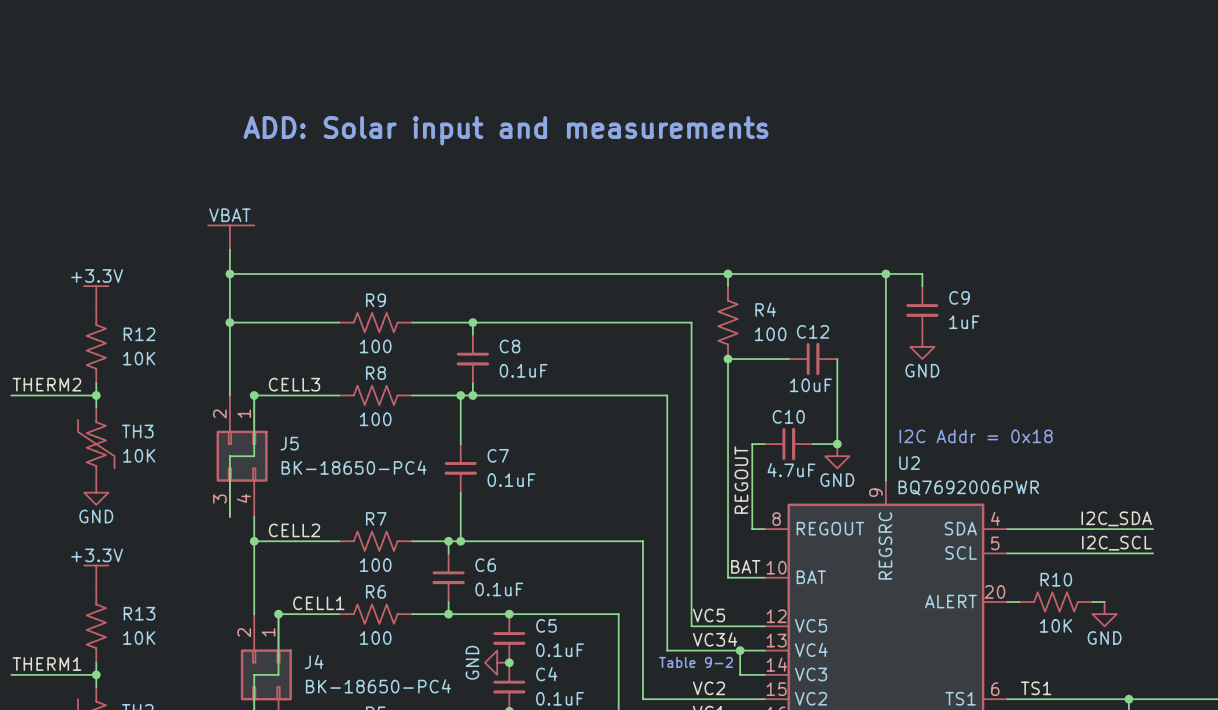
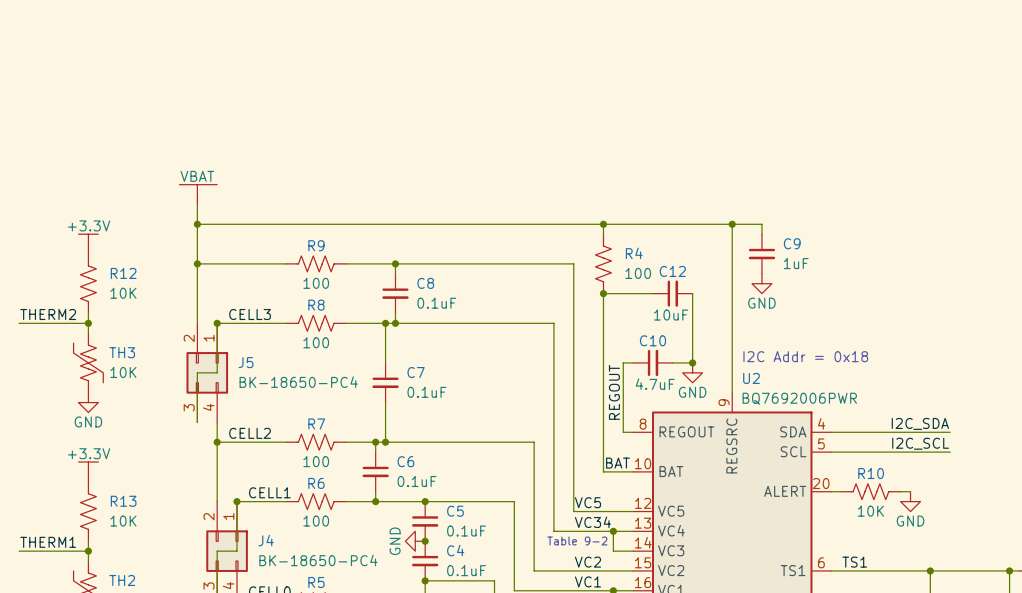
text: ADD: Solar input and measurements (505, 130) -> none

